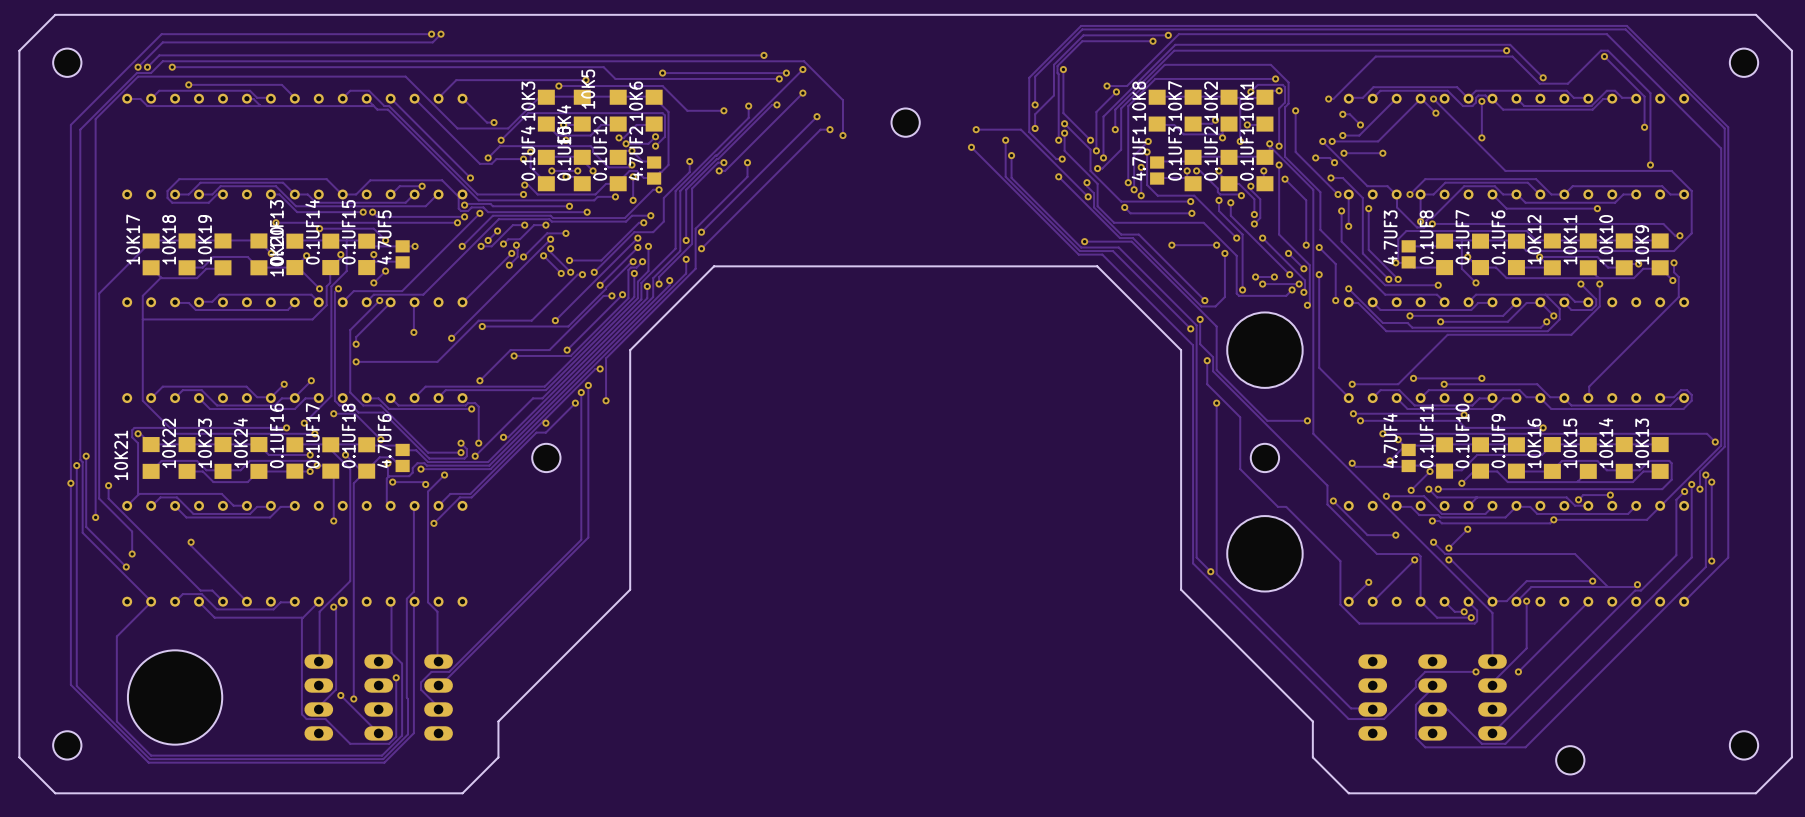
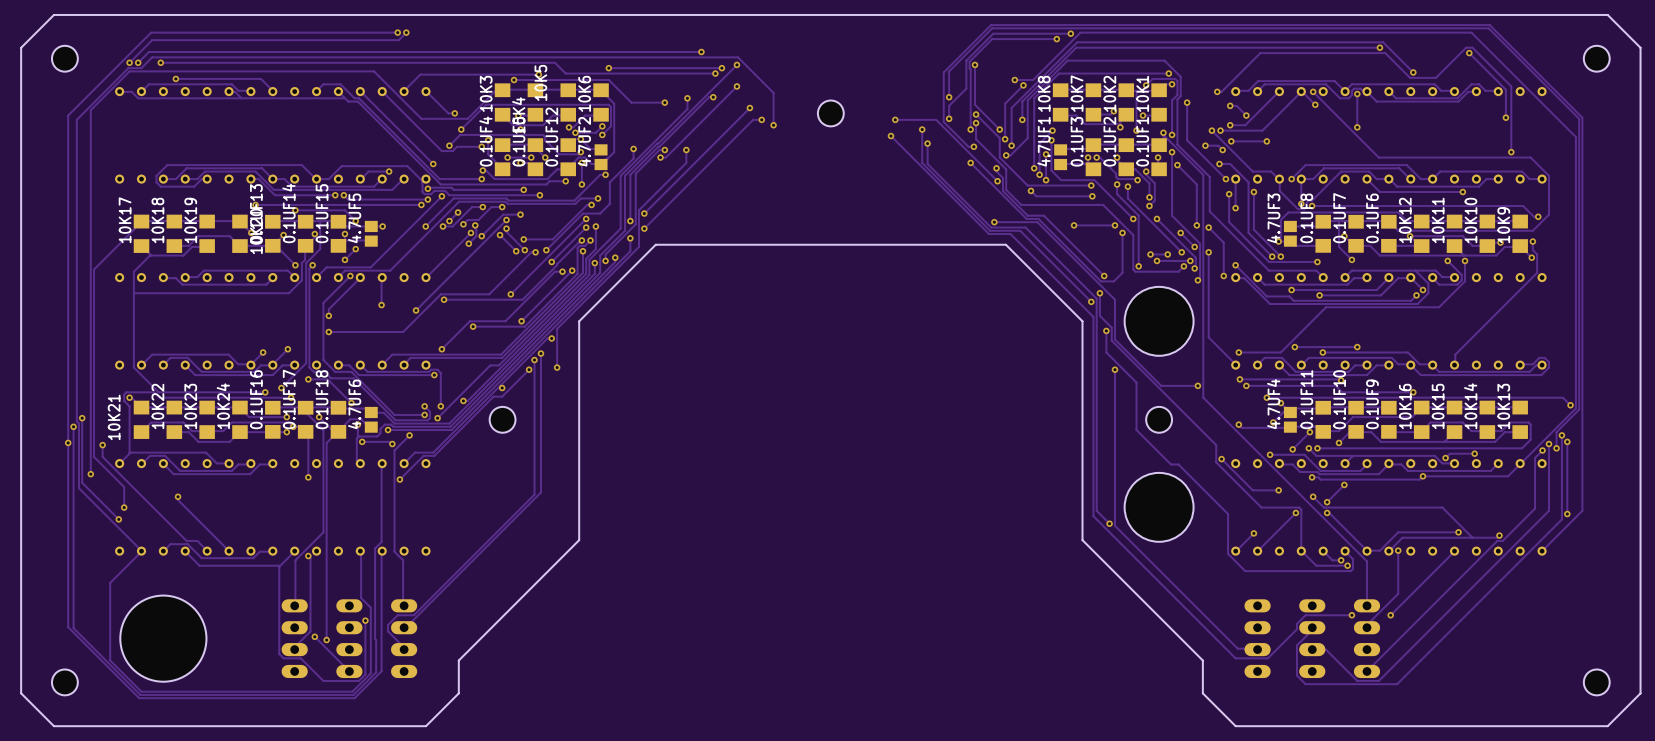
hole: (1570, 760) -> none

